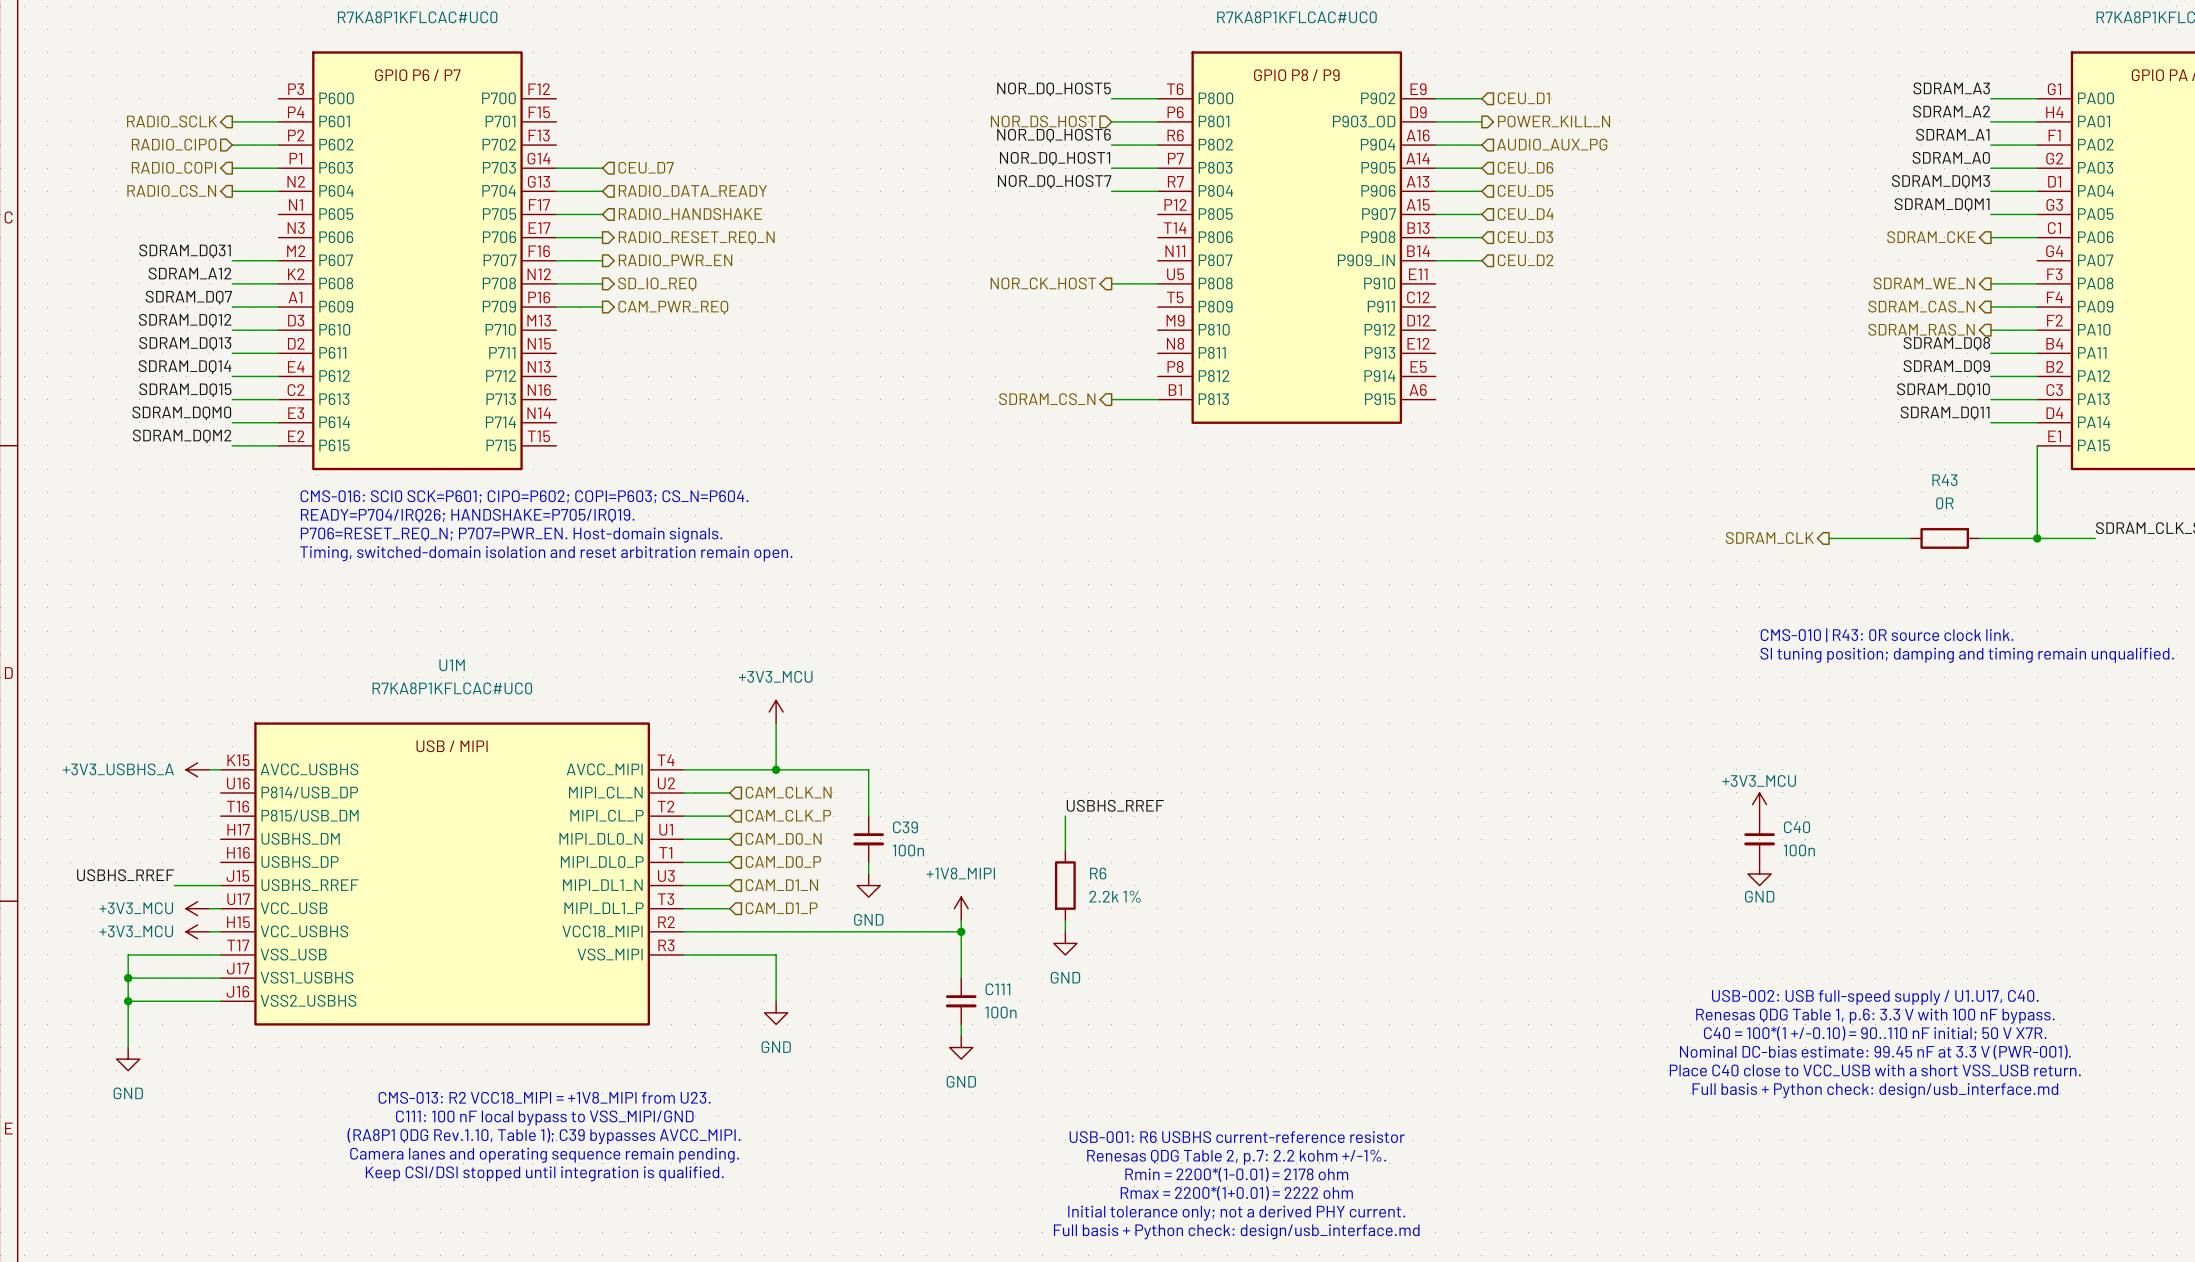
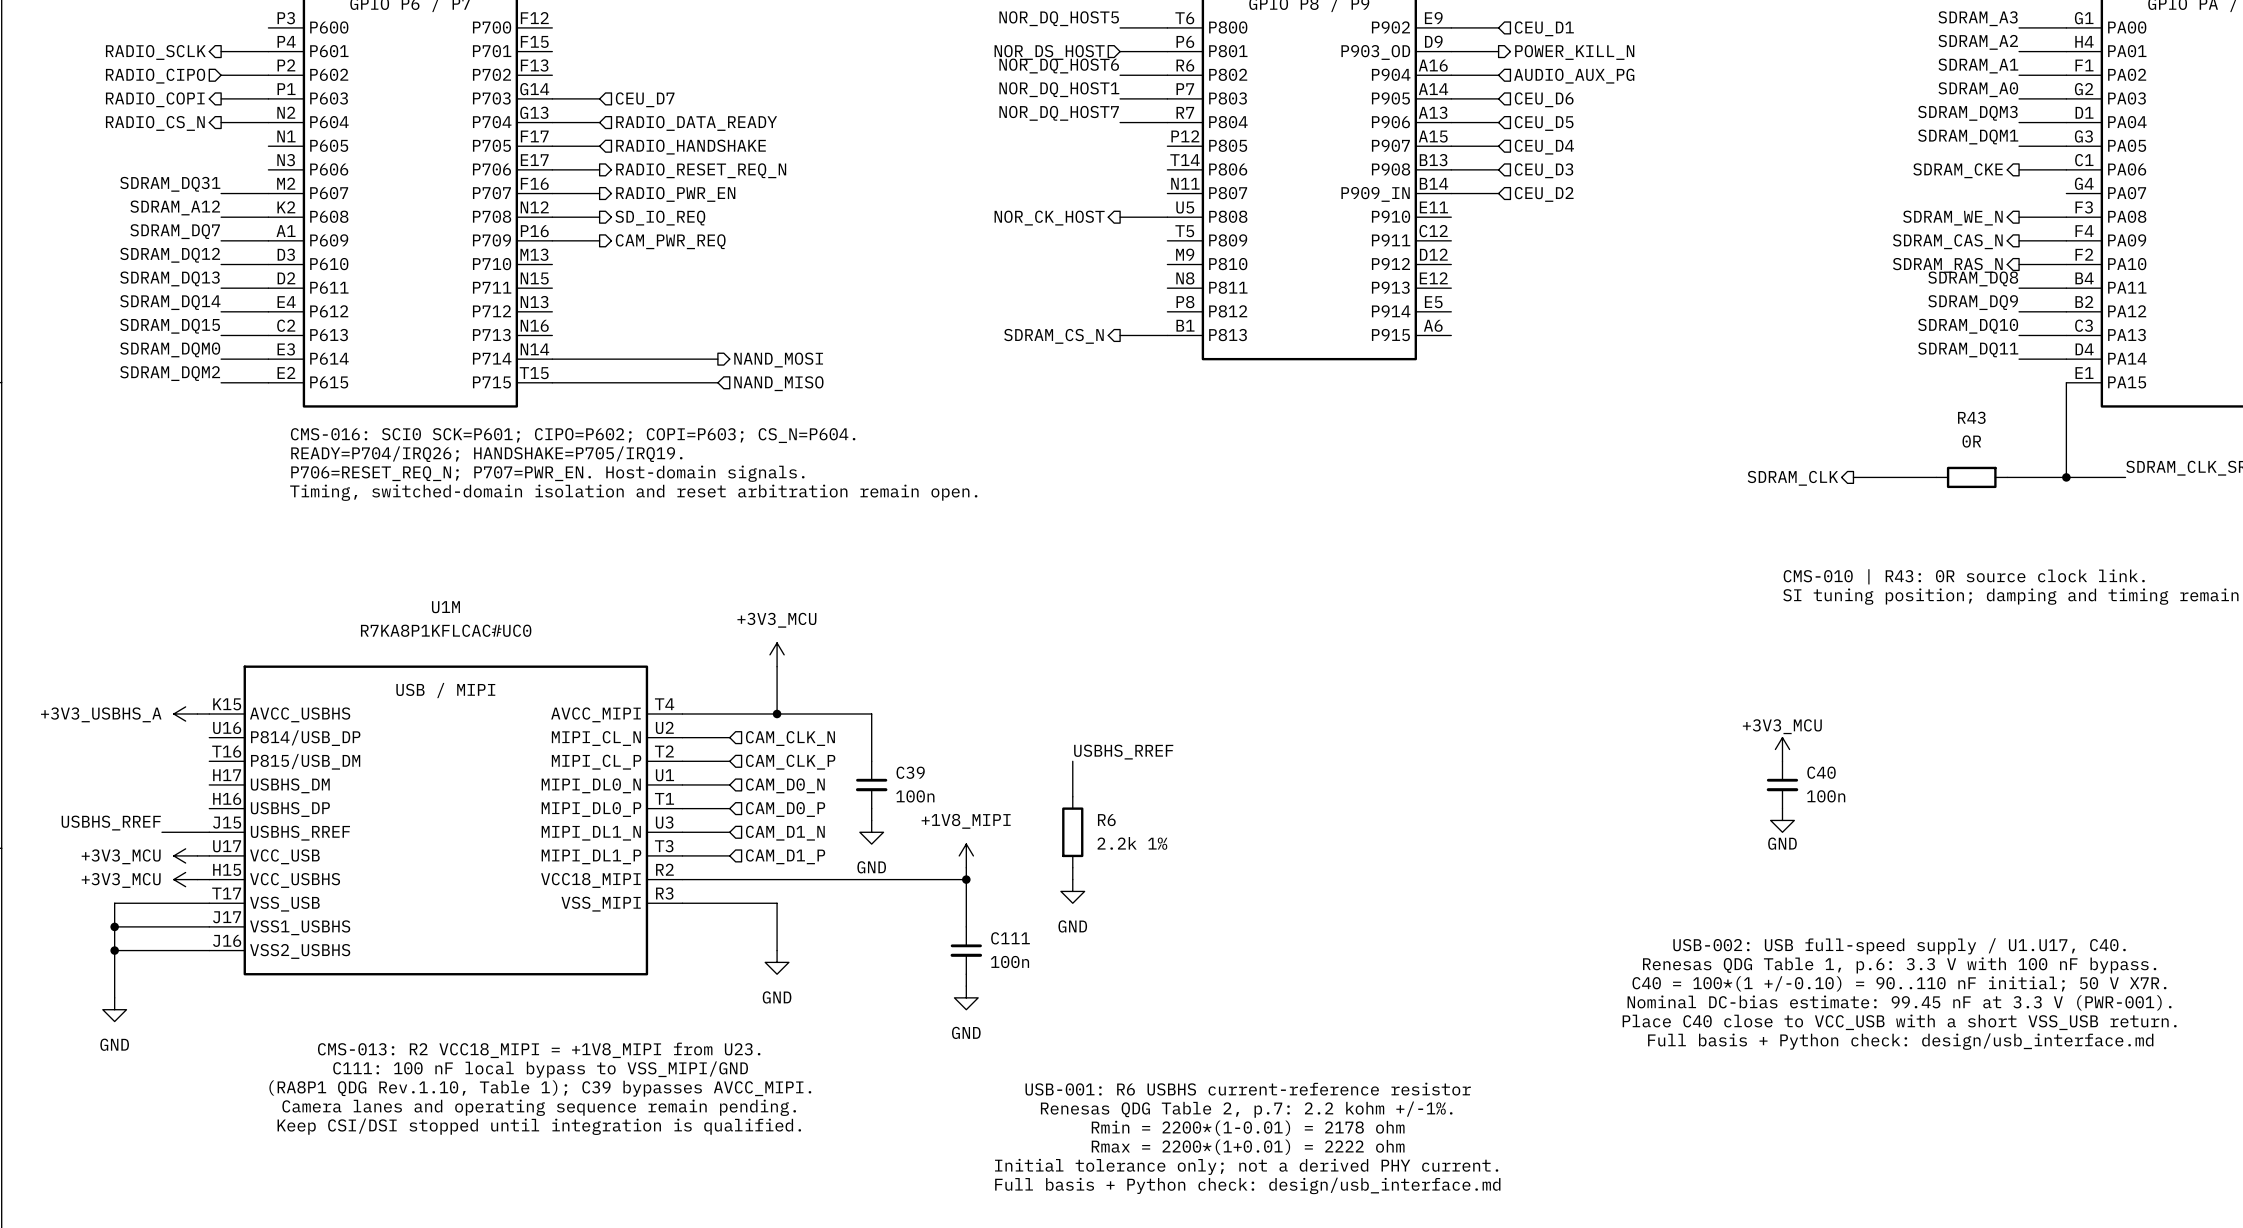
wire: none -> (552, 359) (717, 359)
hierarchical label: none -> NAND_MOSI (778, 360)
wire: none -> (552, 382) (717, 382)
hierarchical label: none -> NAND_MISO (778, 383)

